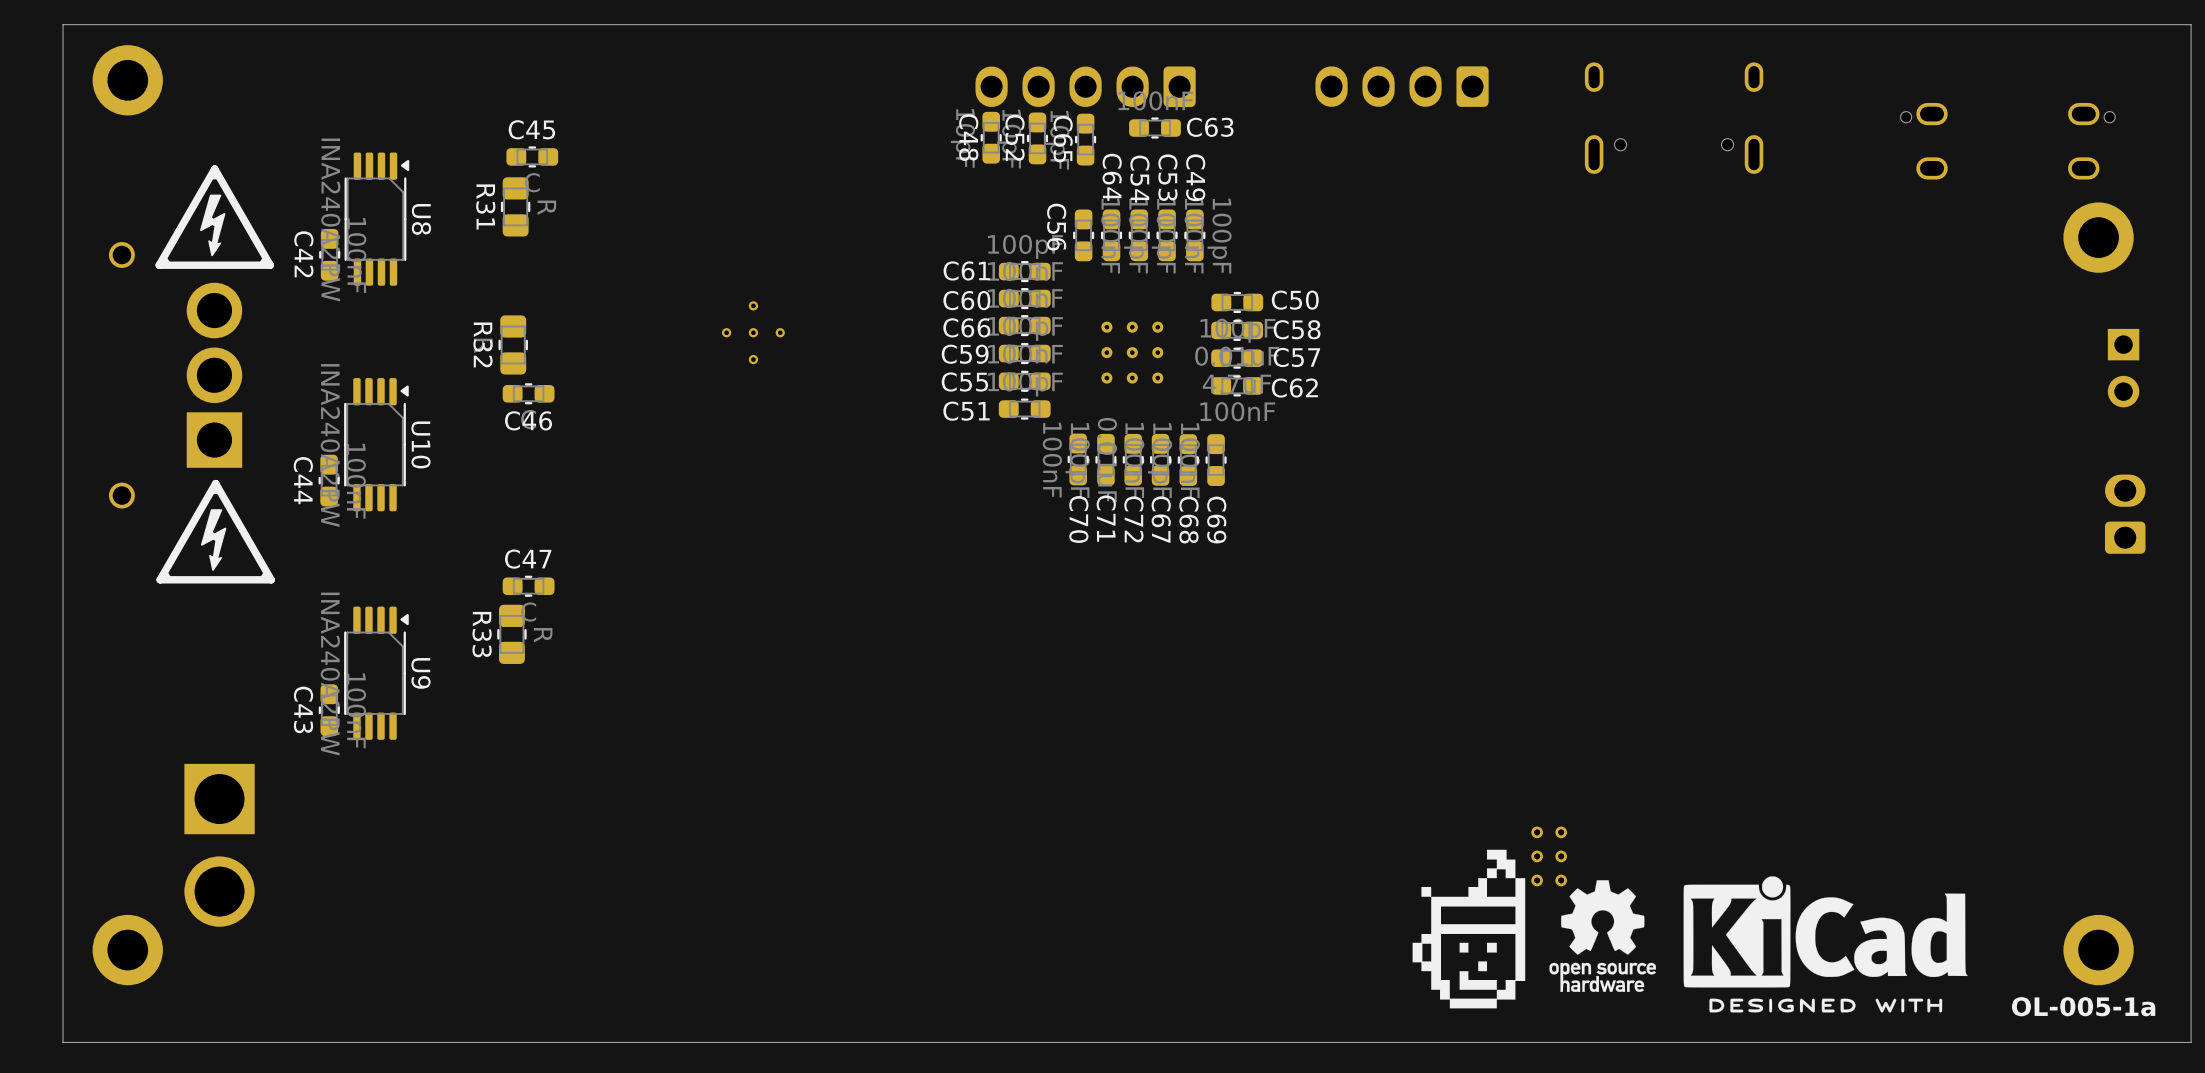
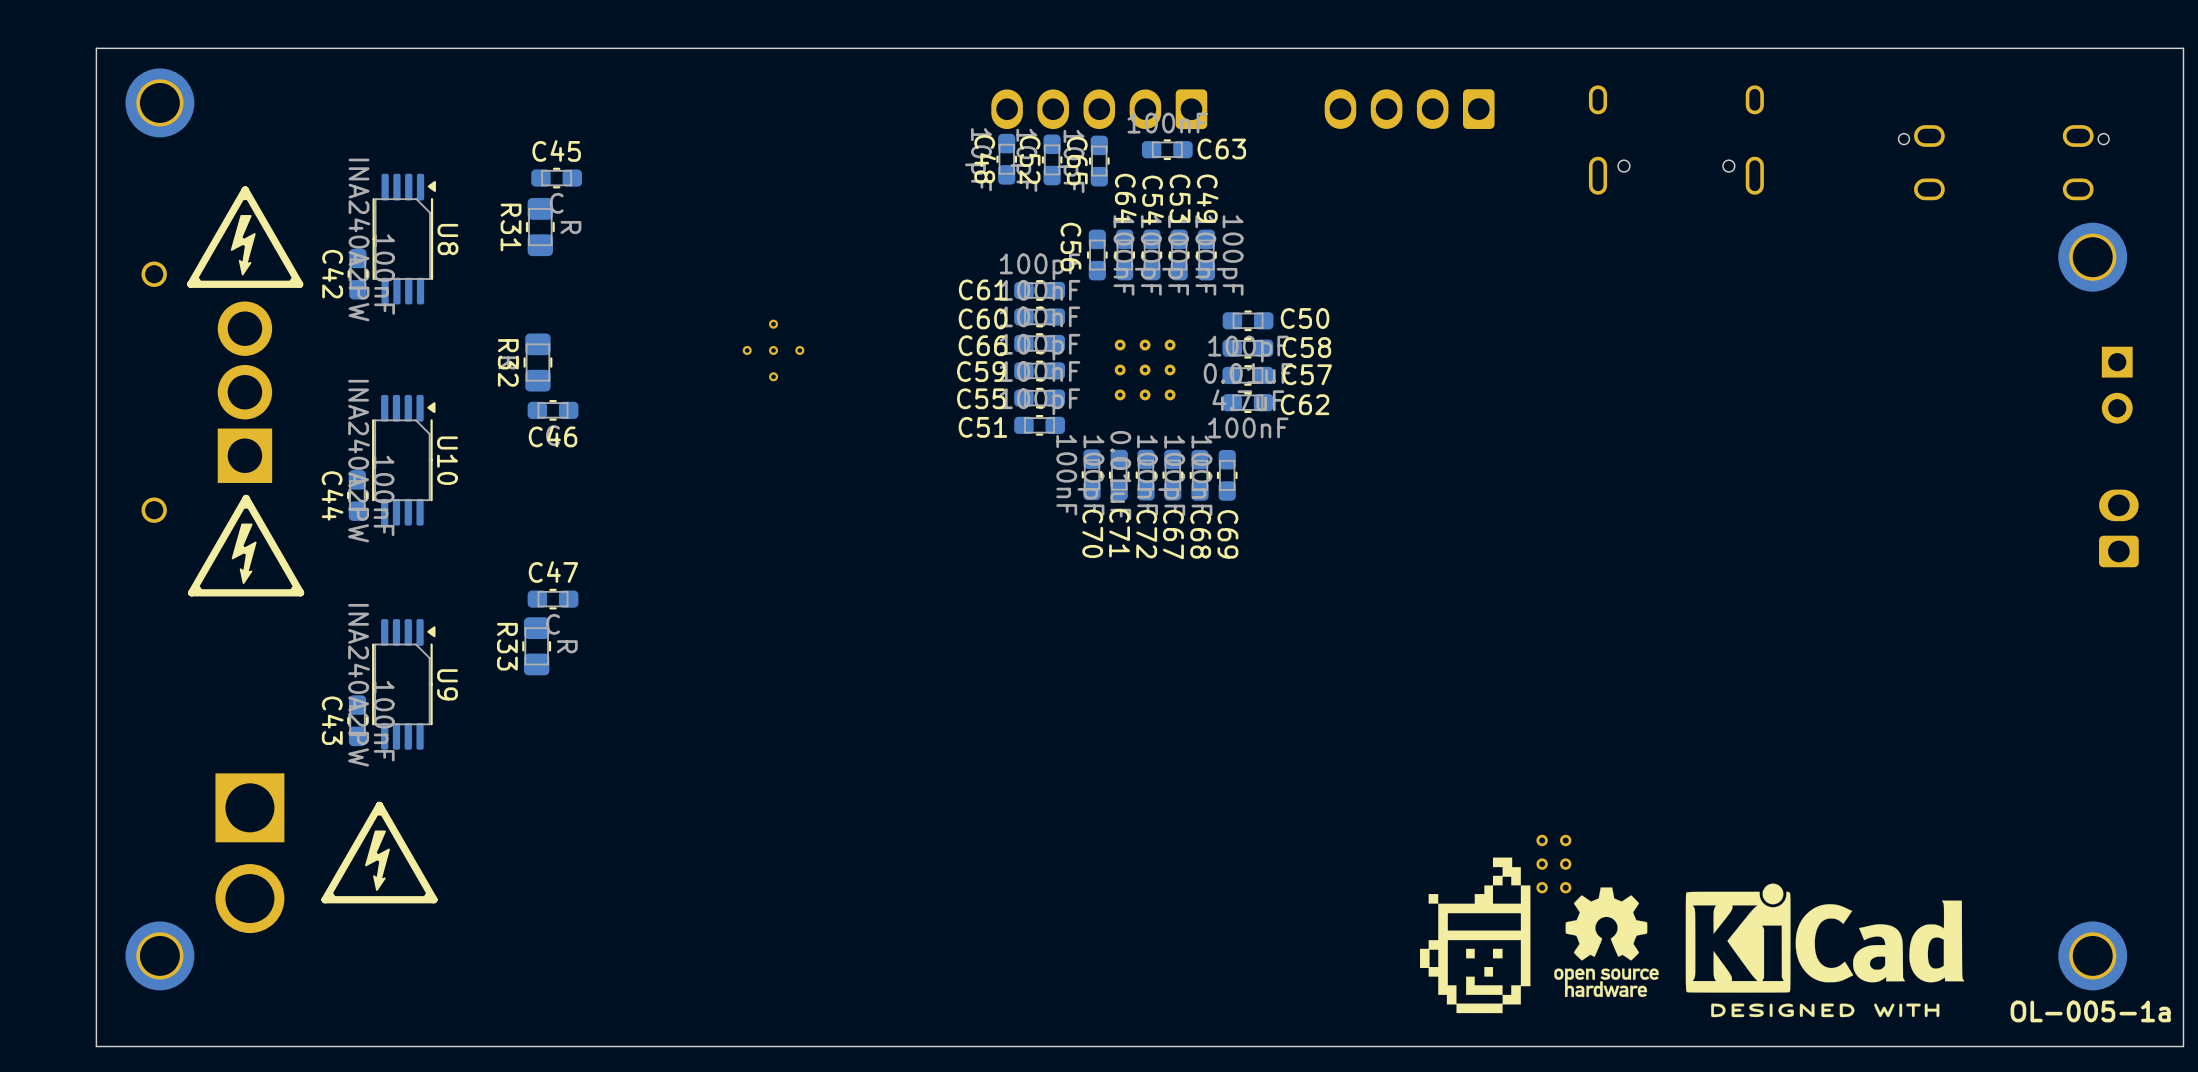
drawing: none -> [321, 801, 438, 904]

